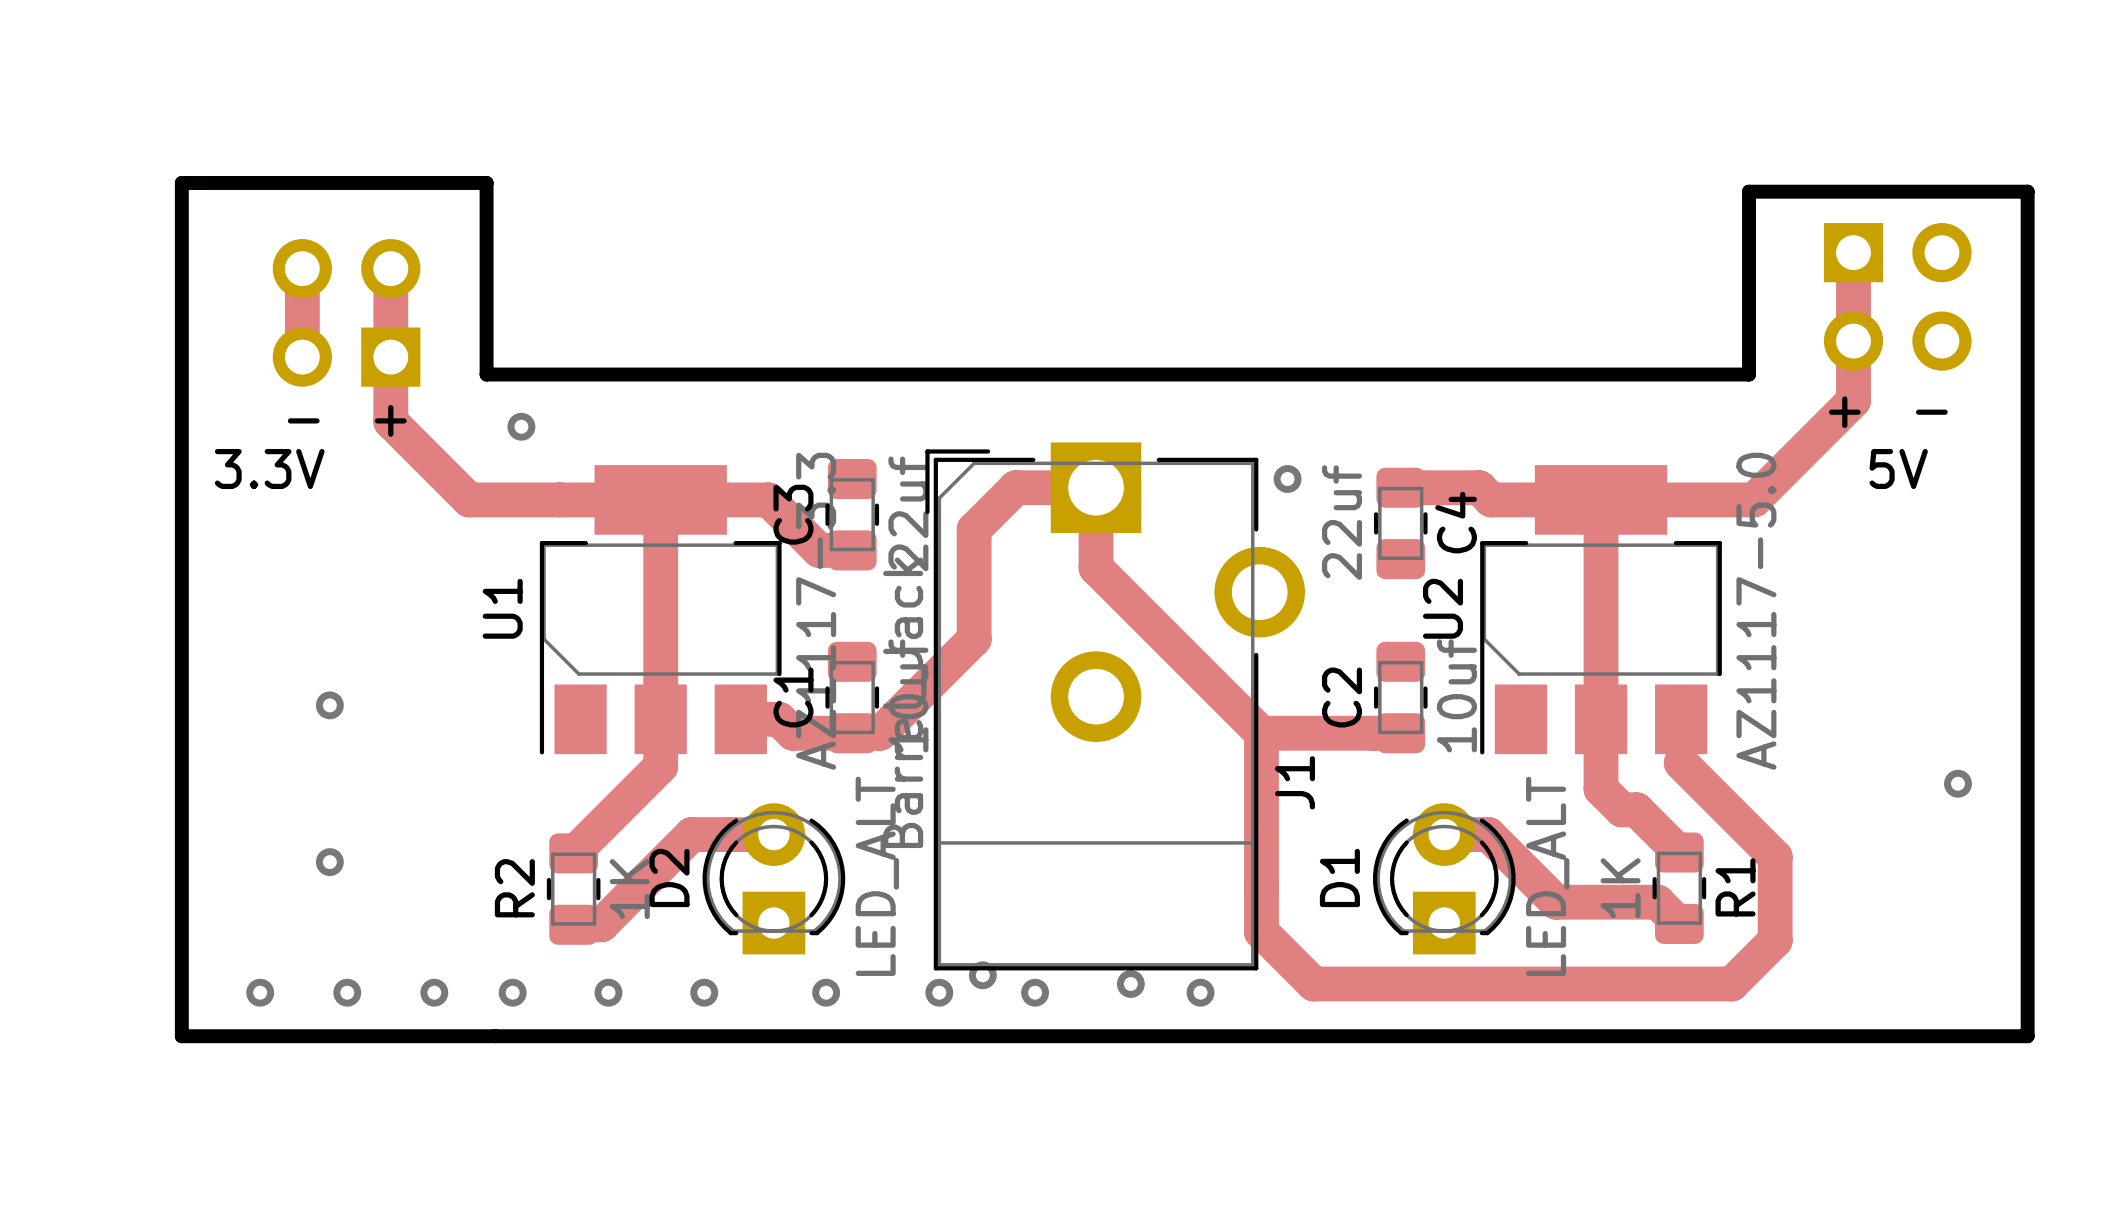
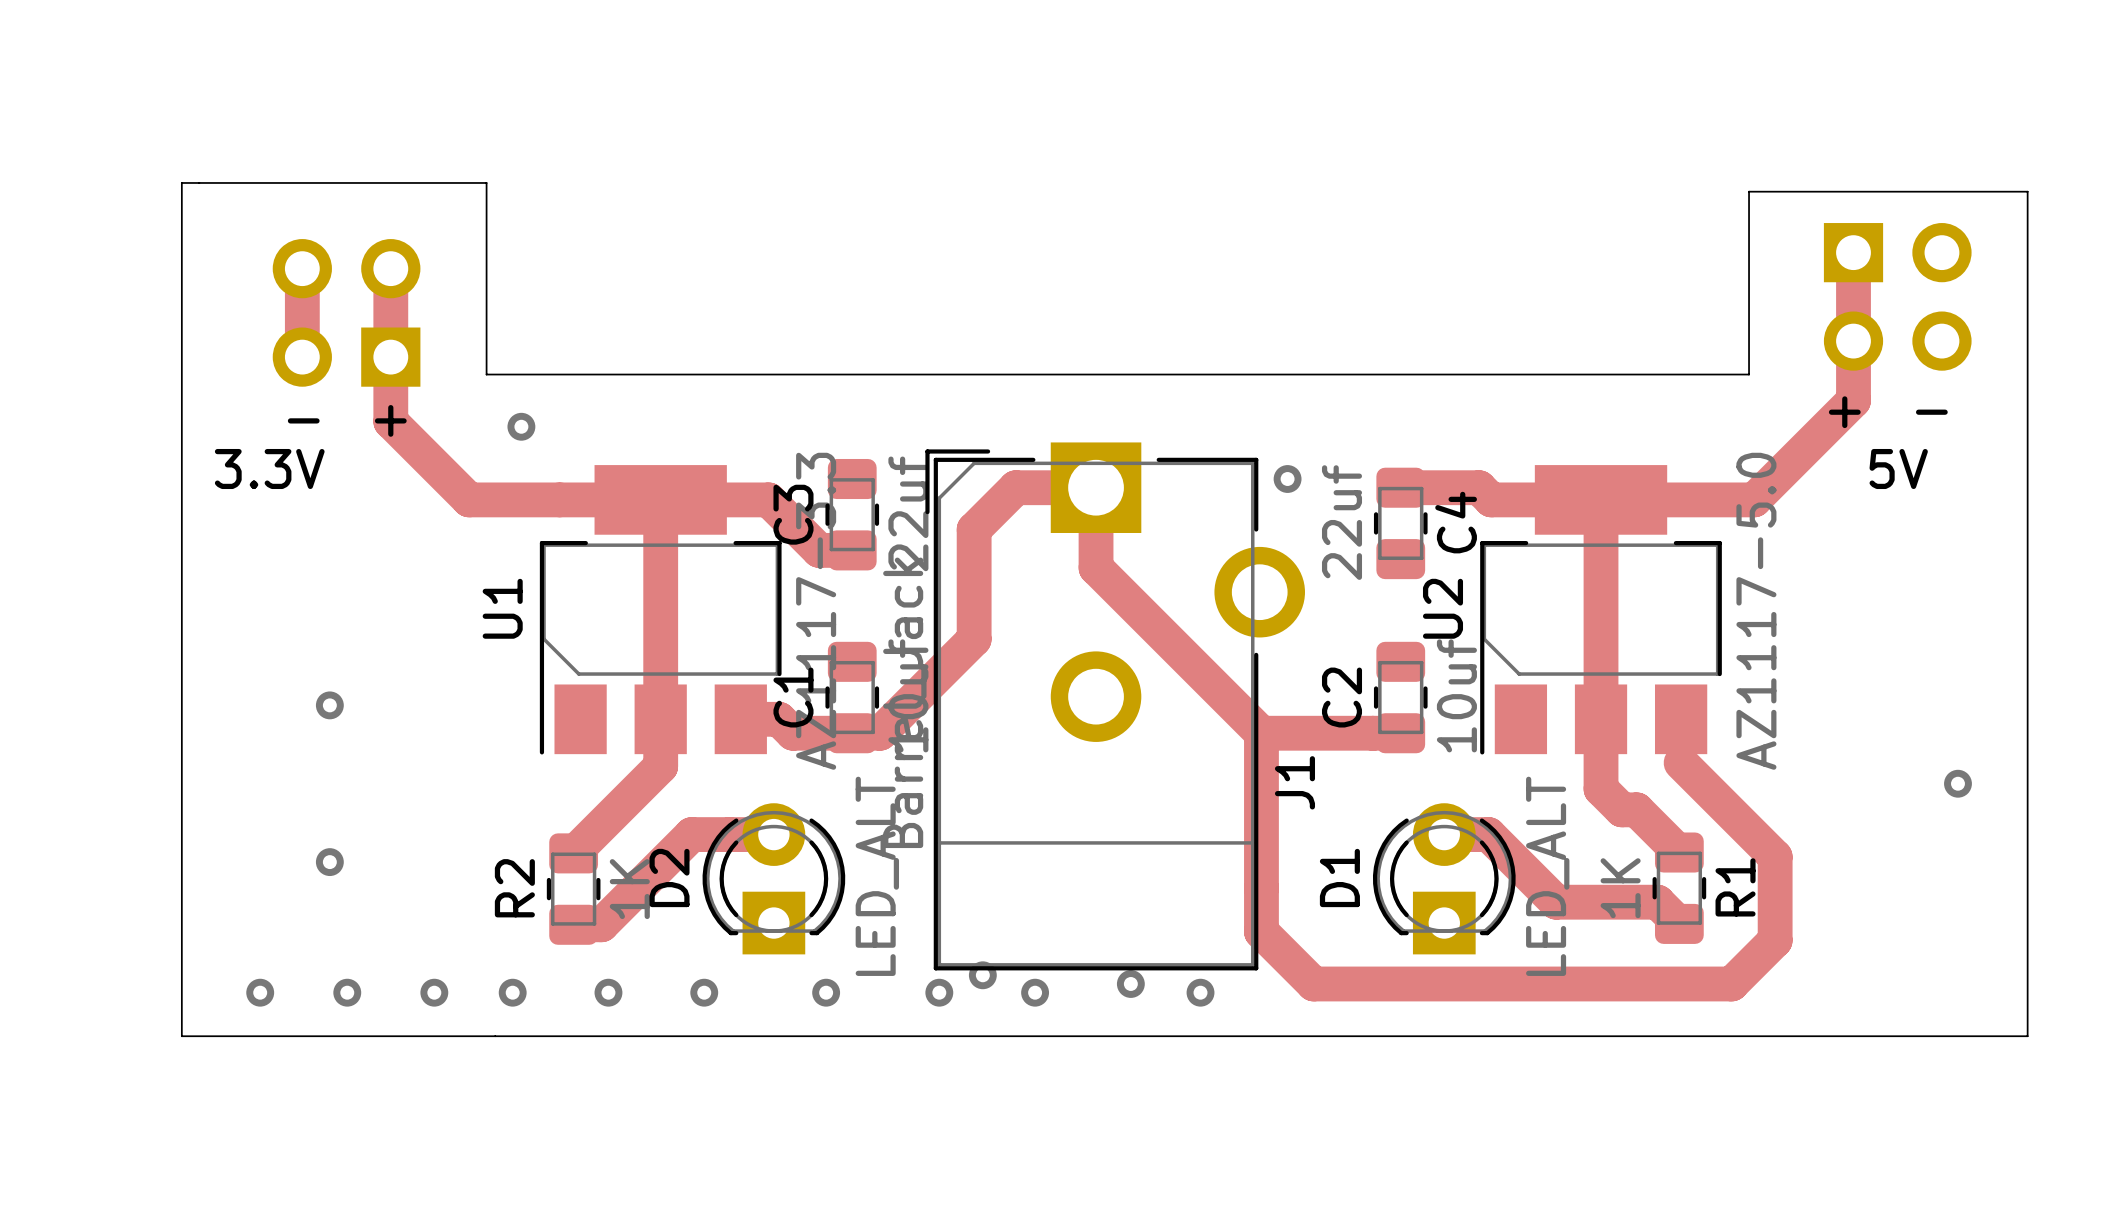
board edge width: thick (181, 182) (486, 182) (486, 374) (1749, 374) (1749, 191) (2027, 191) (2027, 1036) (181, 1036) (181, 182) -> thin (181, 182) (486, 182) (486, 374) (1749, 374) (1749, 191) (2027, 191) (2027, 1036) (181, 1036) (181, 182)

